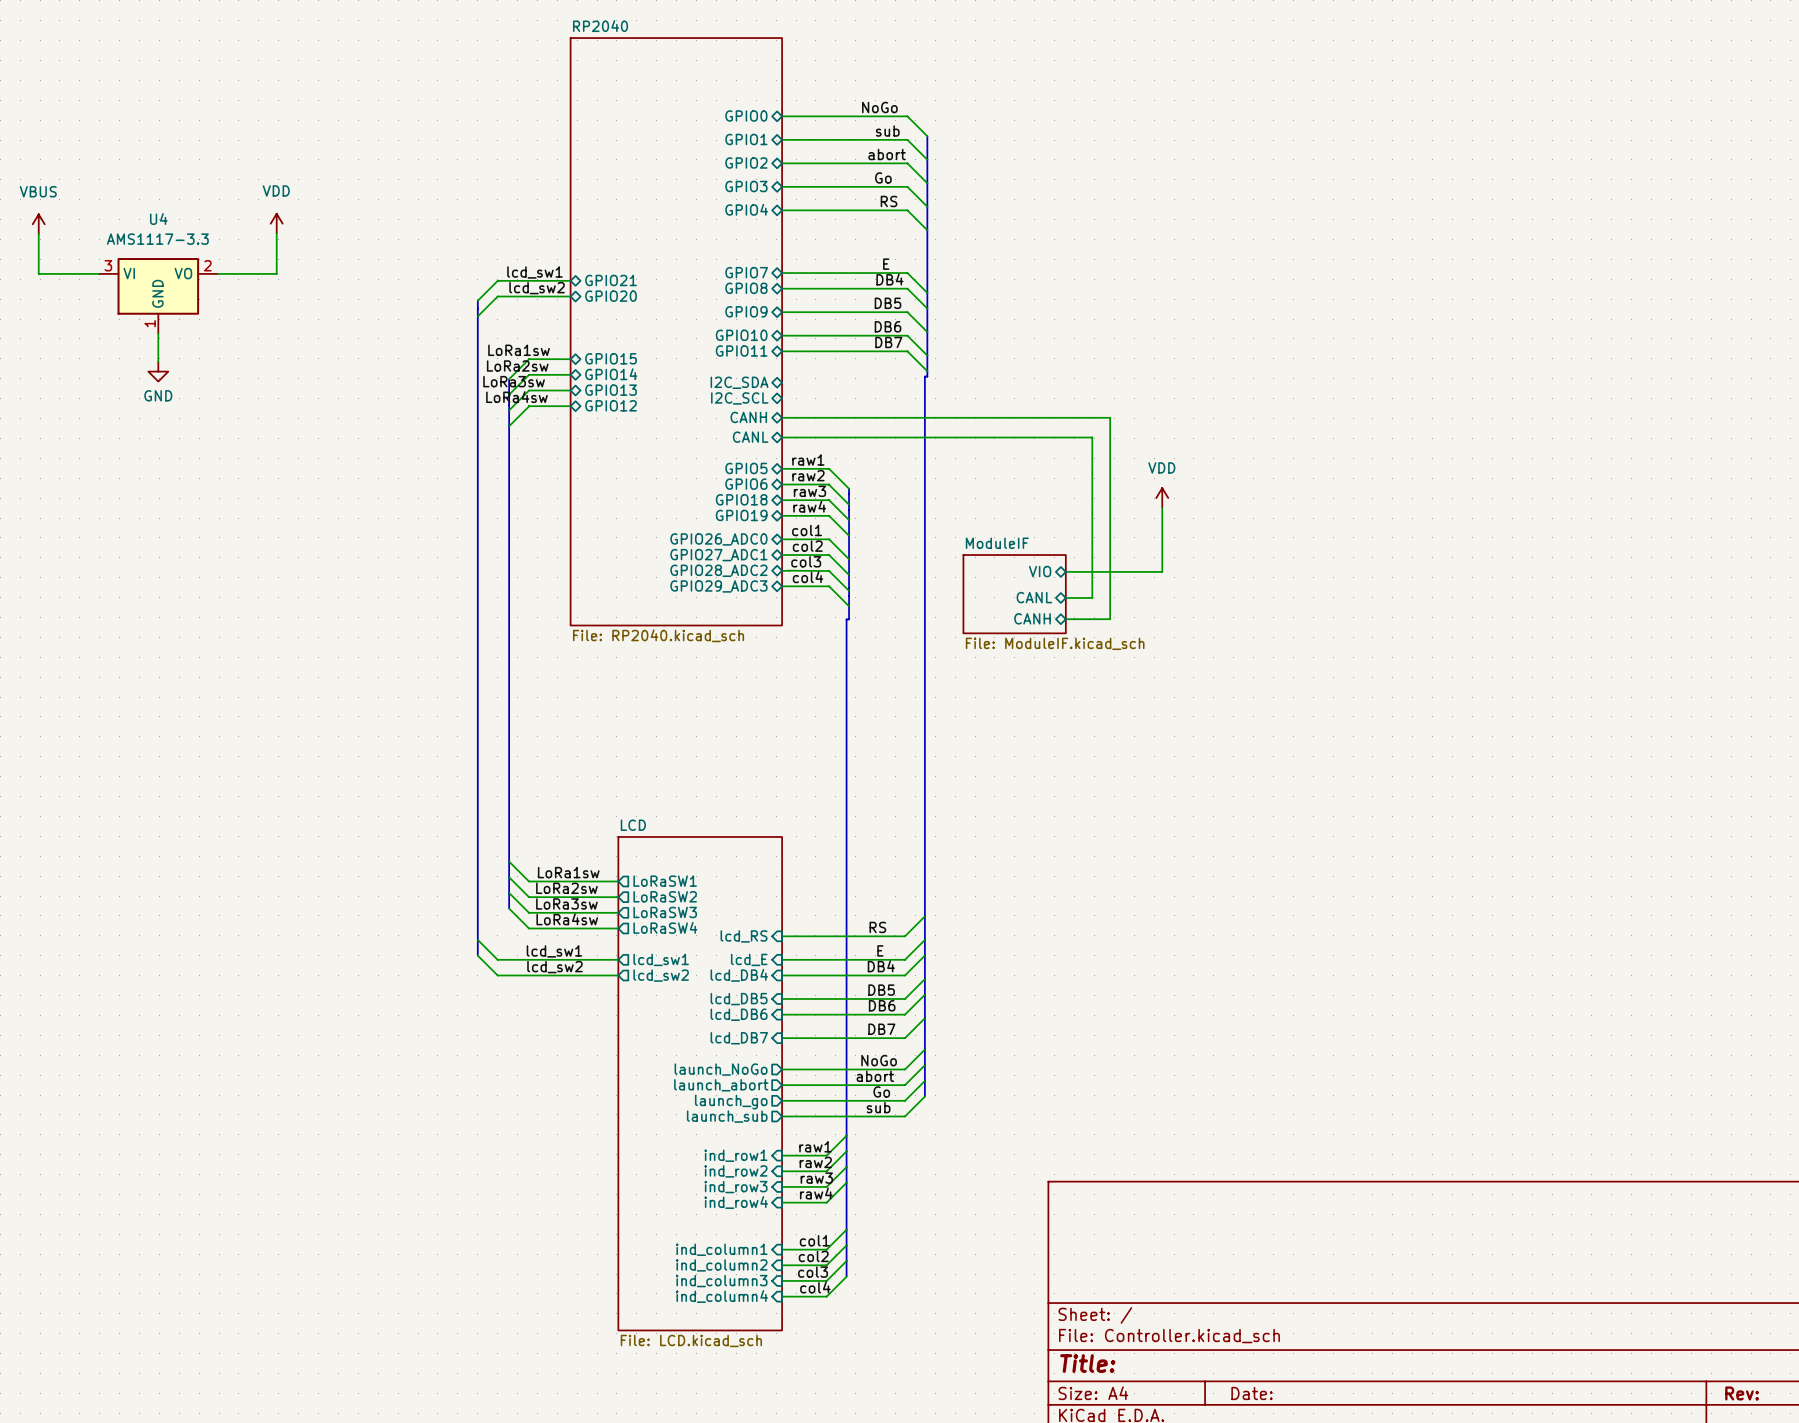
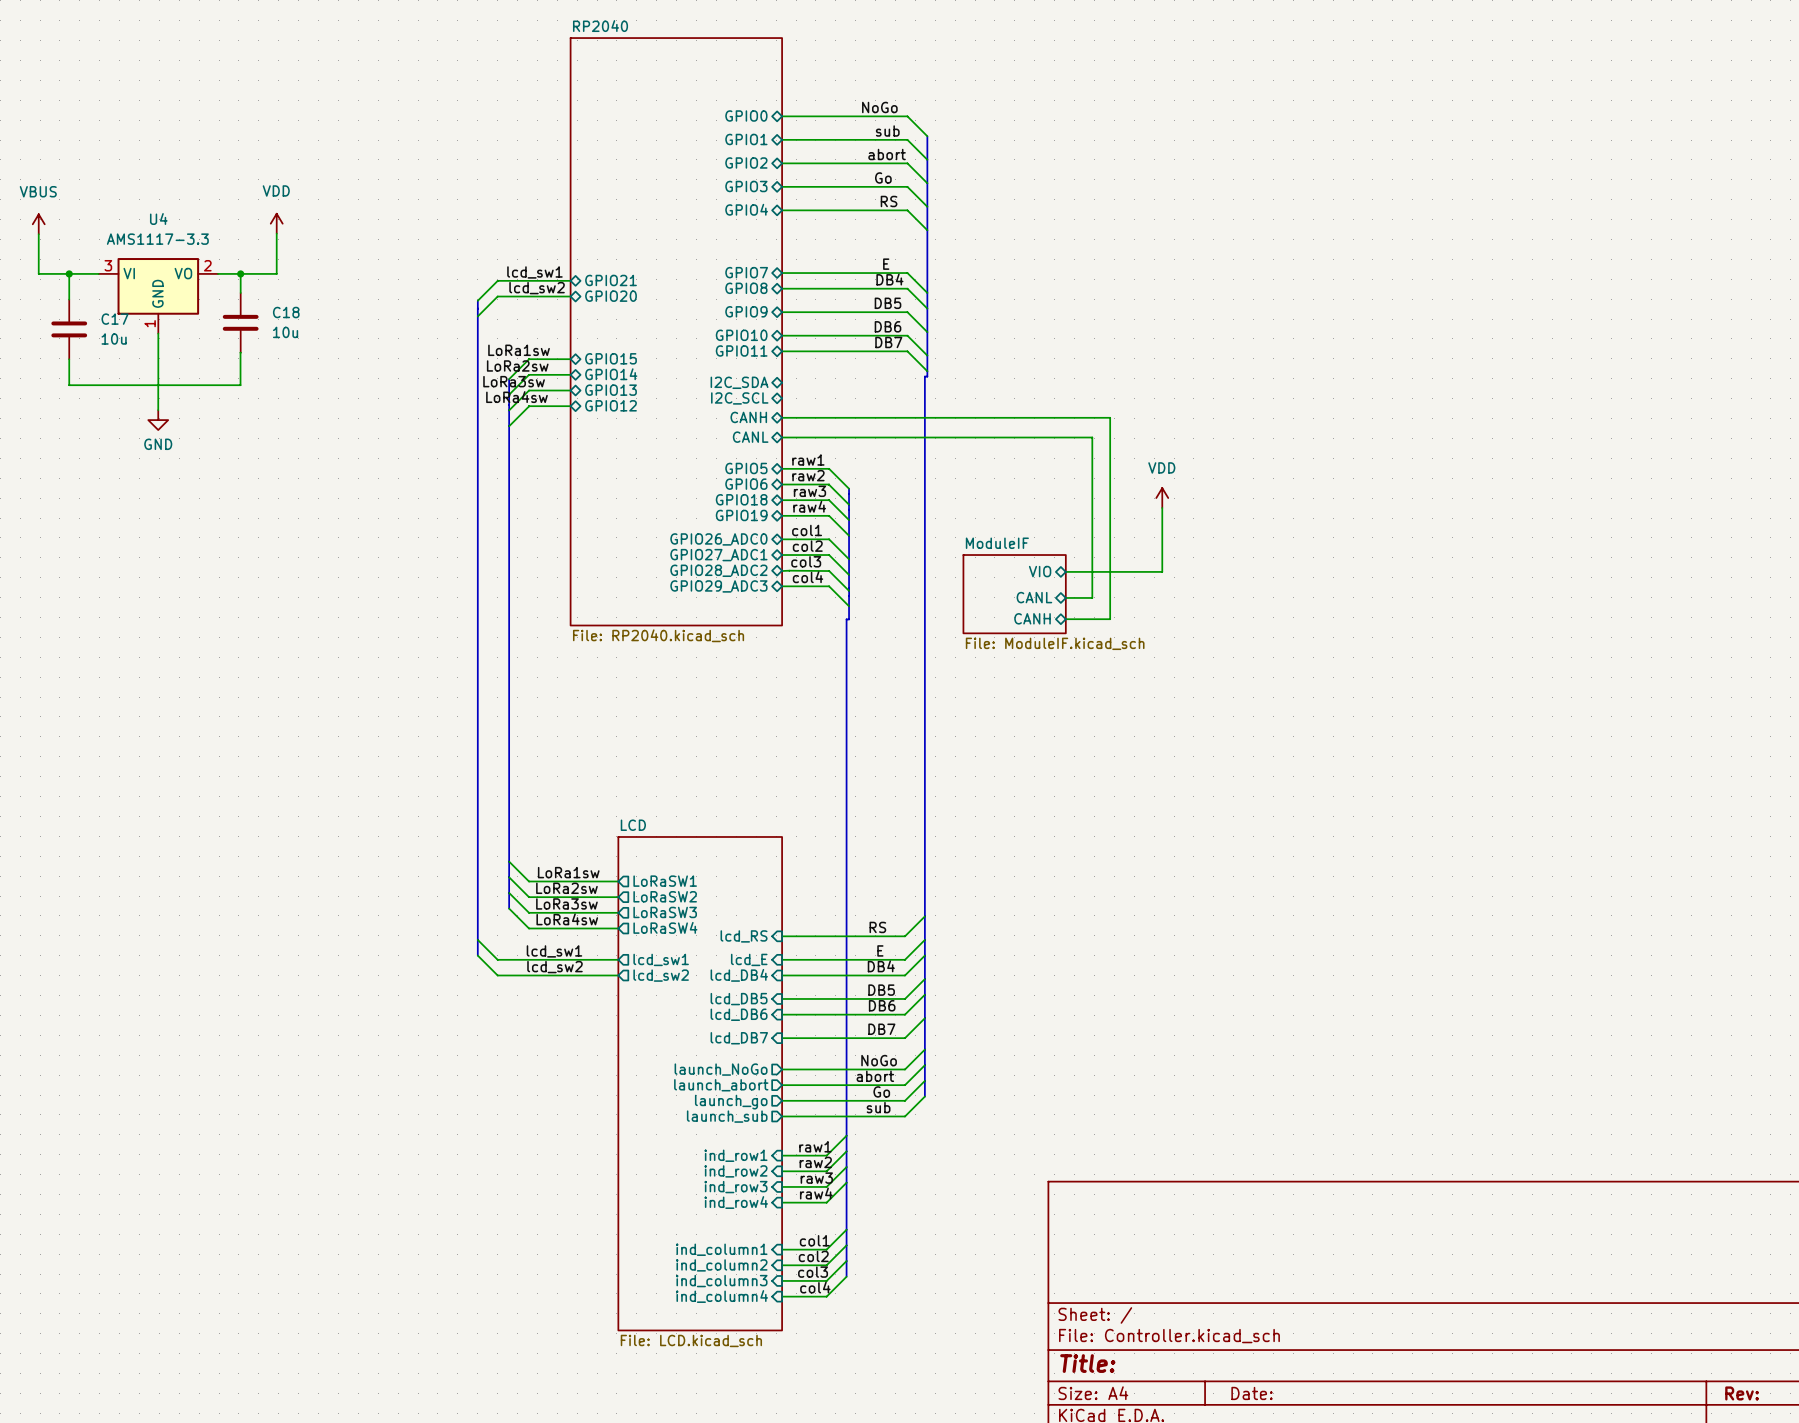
wire: none -> (69, 273) (69, 299)
junction: none -> (69, 273)
wire: none -> (240, 273) (240, 292)
junction: none -> (240, 273)
C18: none -> 10u (240, 322)
C17: none -> 10u (69, 329)
wire: none -> (240, 352) (240, 385) (69, 385) (69, 359)
power symbol position: GND (158, 371) -> GND (158, 420)
wire: none -> (158, 385) (158, 410)

